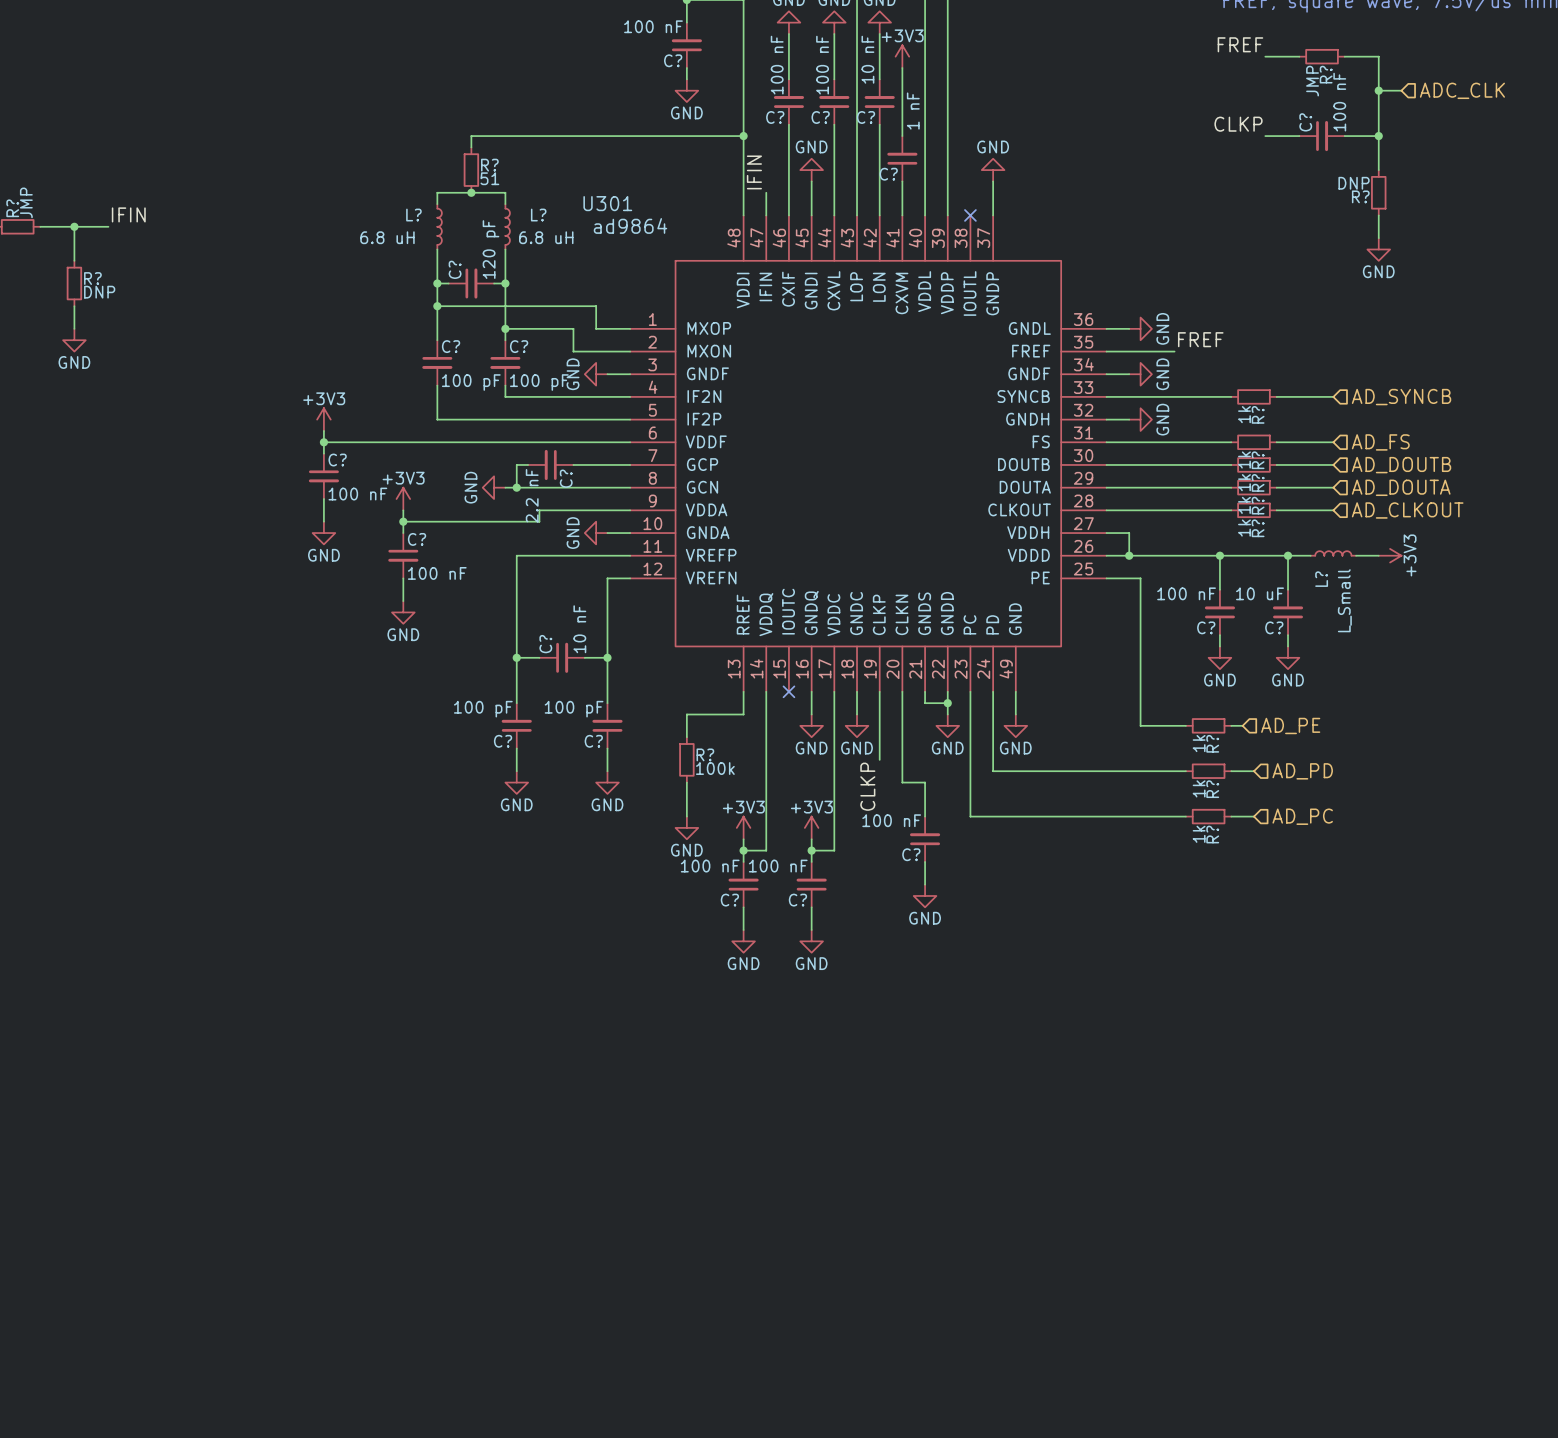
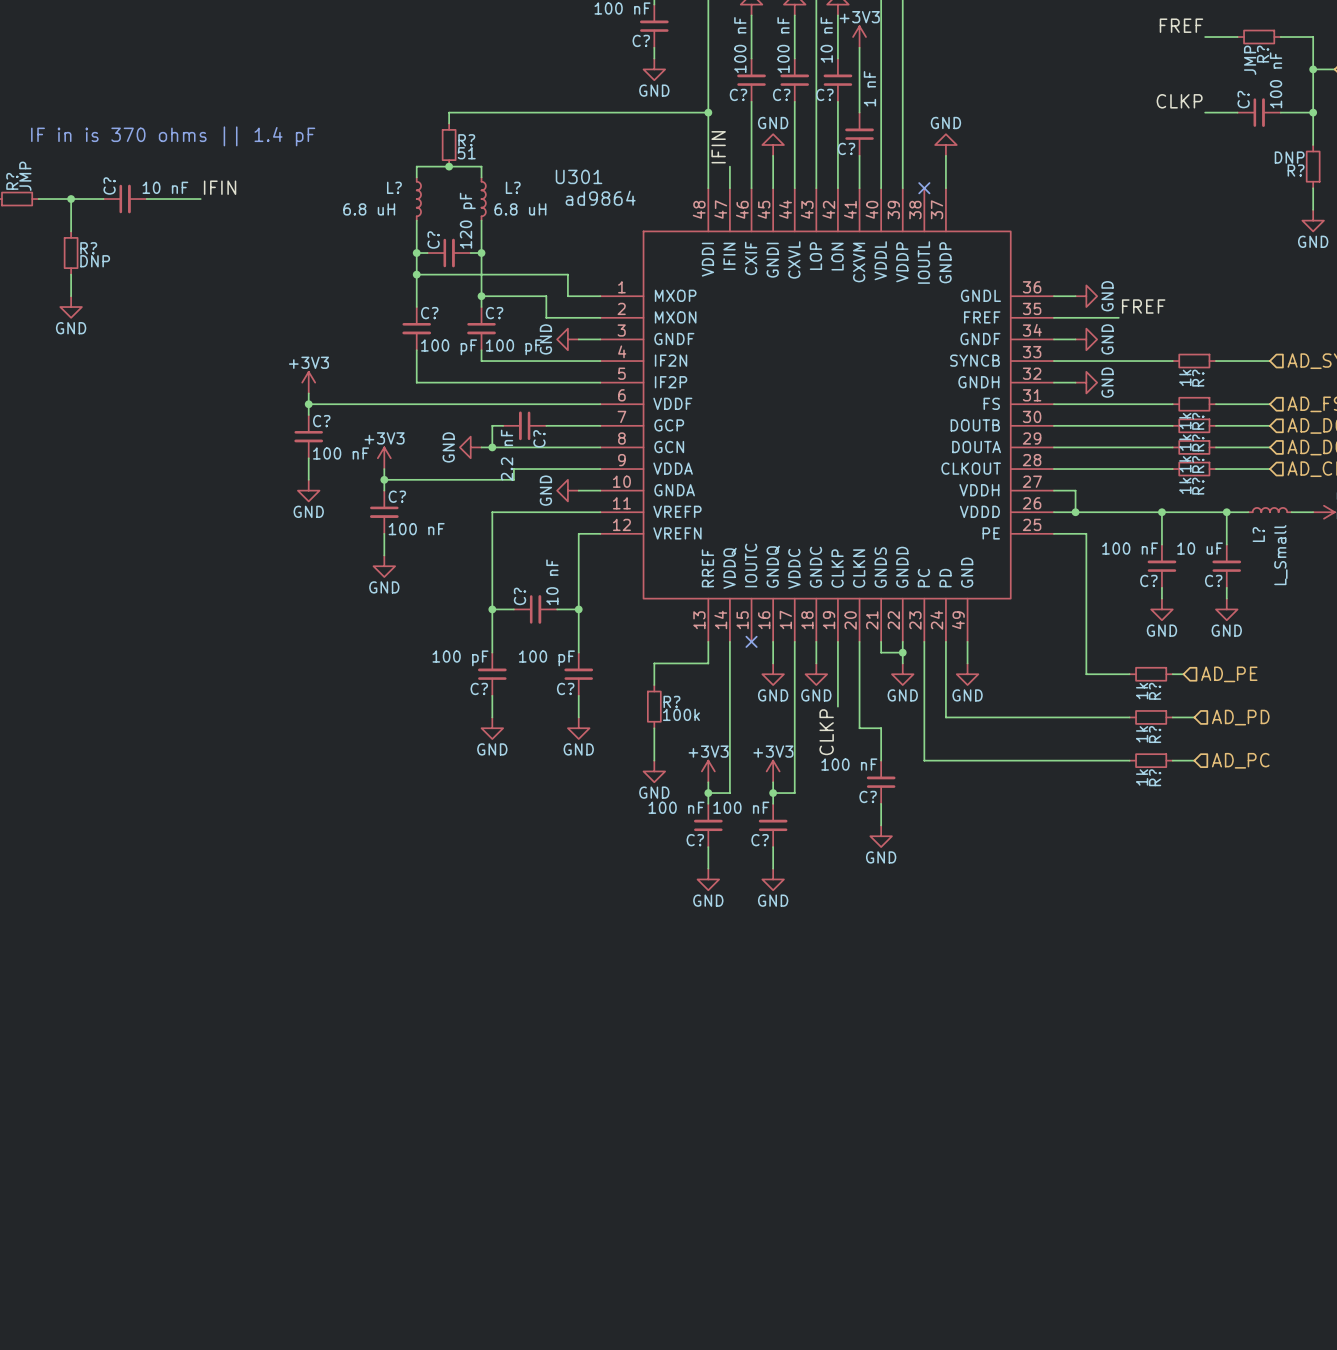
text: none -> IF in is 370 ohms || 1.4 pF (173, 136)
label position: IFIN (128, 214) -> IFIN (220, 187)
C?: none -> 10 nF (125, 199)
wire: none -> (146, 199) (200, 199)

